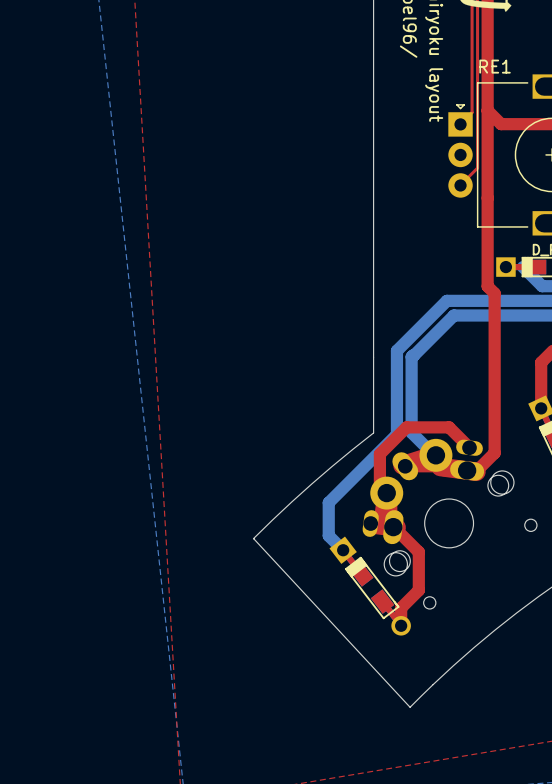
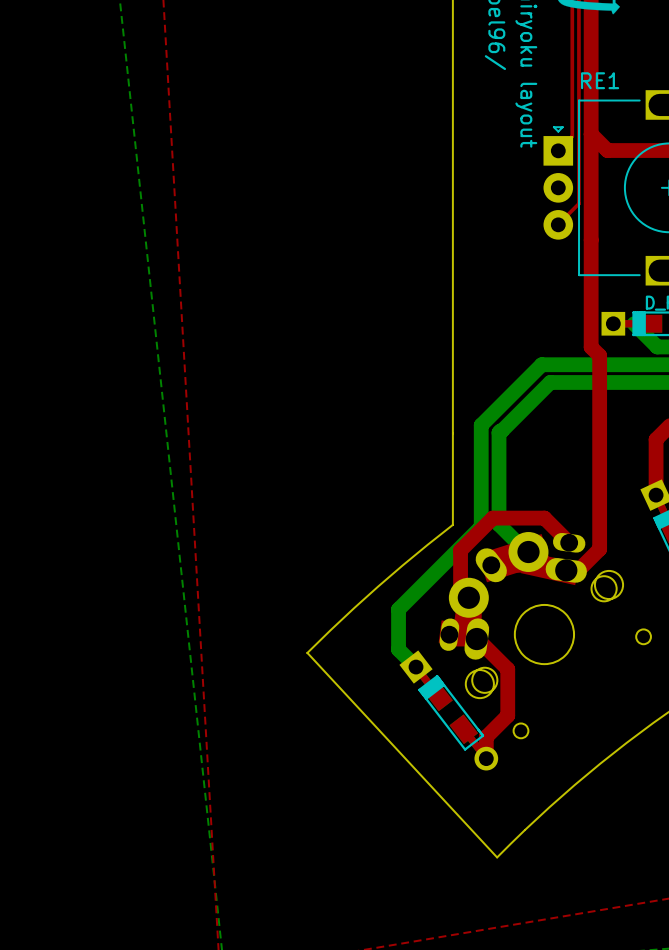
part footprint: [362, 438, 537, 609] -> [438, 532, 651, 739]

